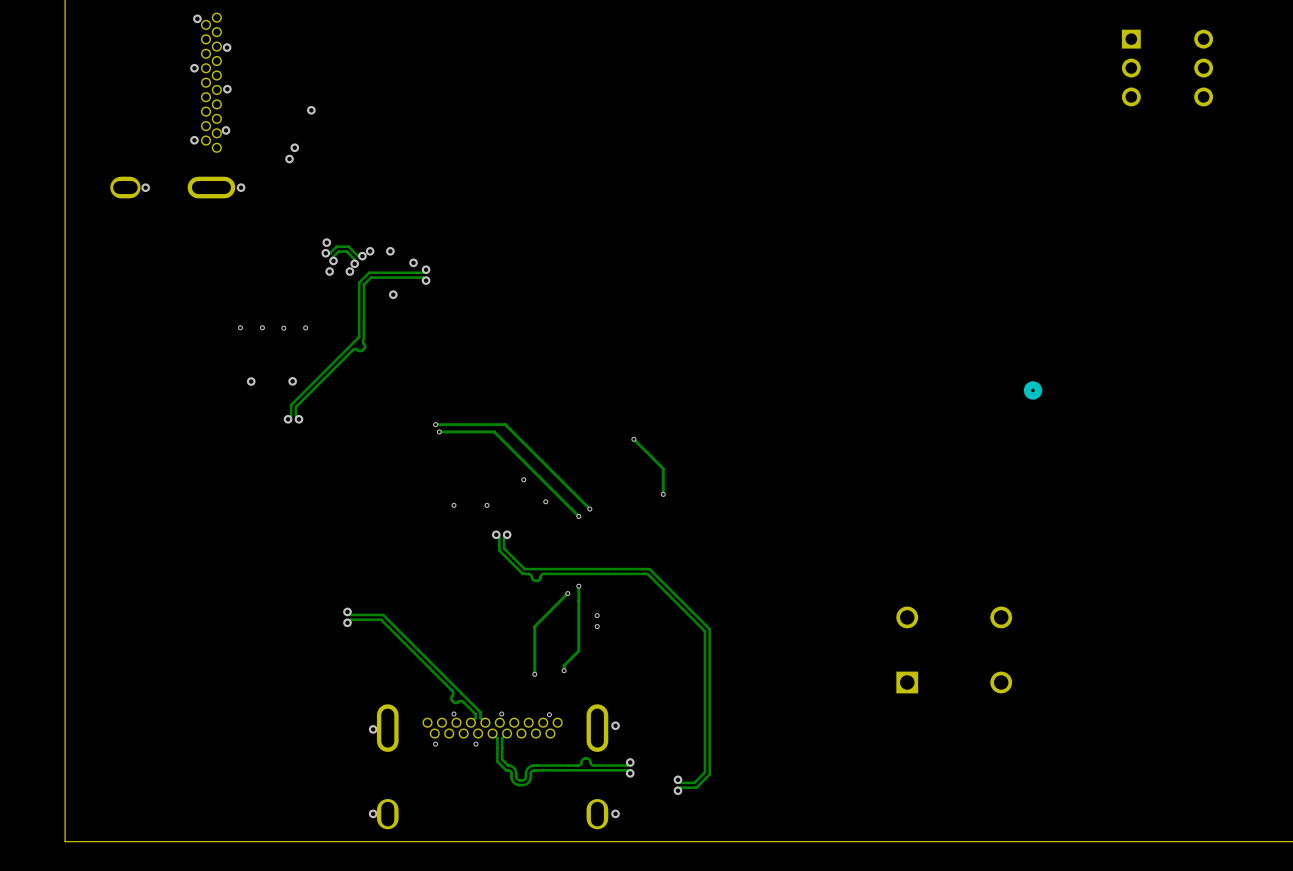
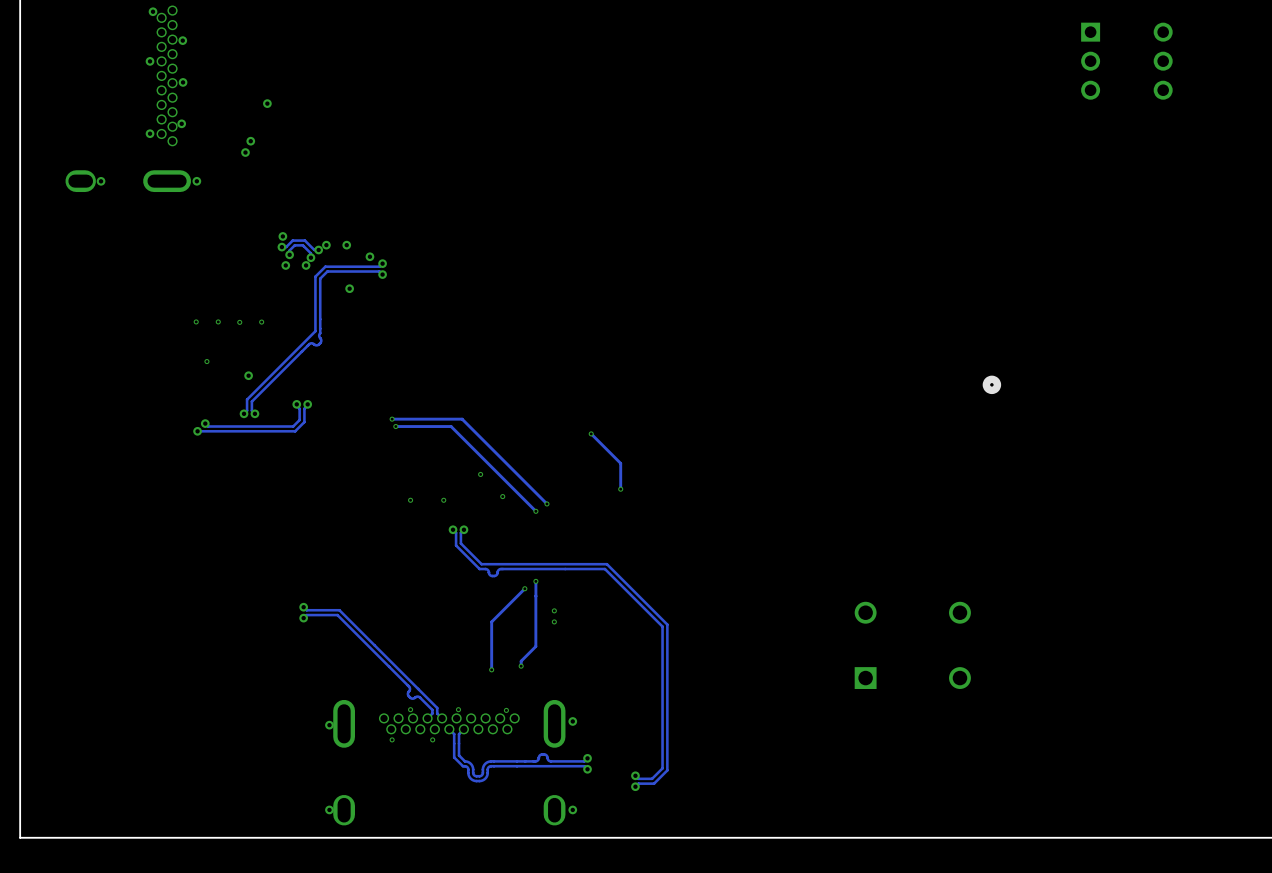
via: none -> (206, 361)
via: (251, 381) -> none
via: none -> (296, 404)
via: none -> (307, 404)
track: none -> (296, 405) (299, 408) (299, 420) (293, 426) (208, 426) (205, 423)
track: none -> (307, 405) (304, 408) (304, 422) (295, 431) (197, 431)
via: none -> (205, 423)
via: none -> (197, 431)

